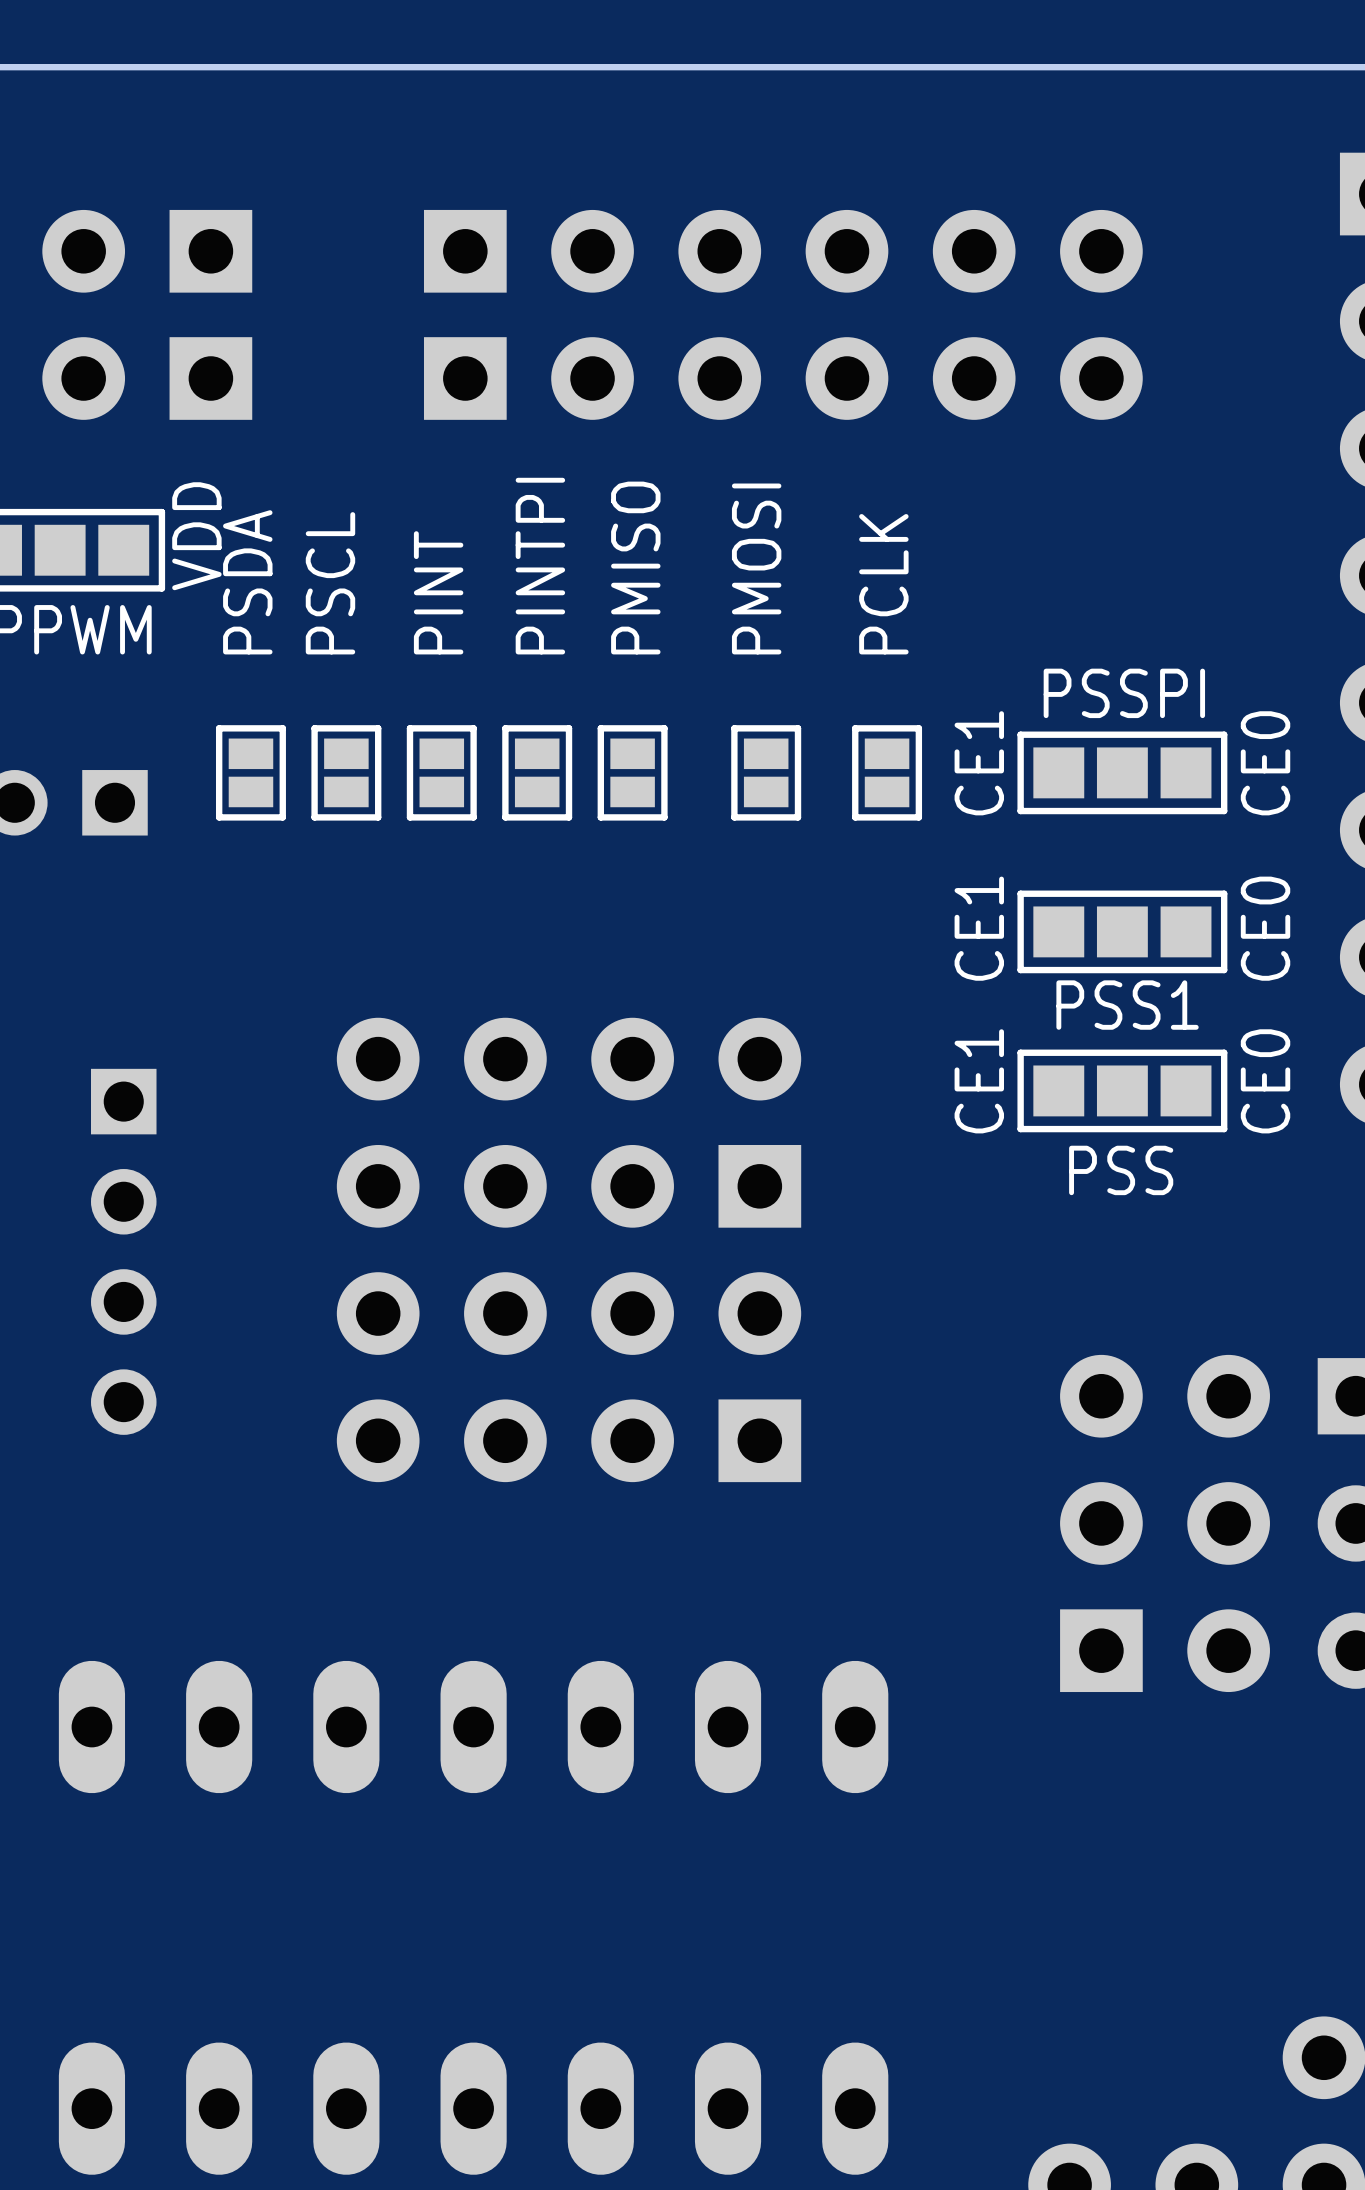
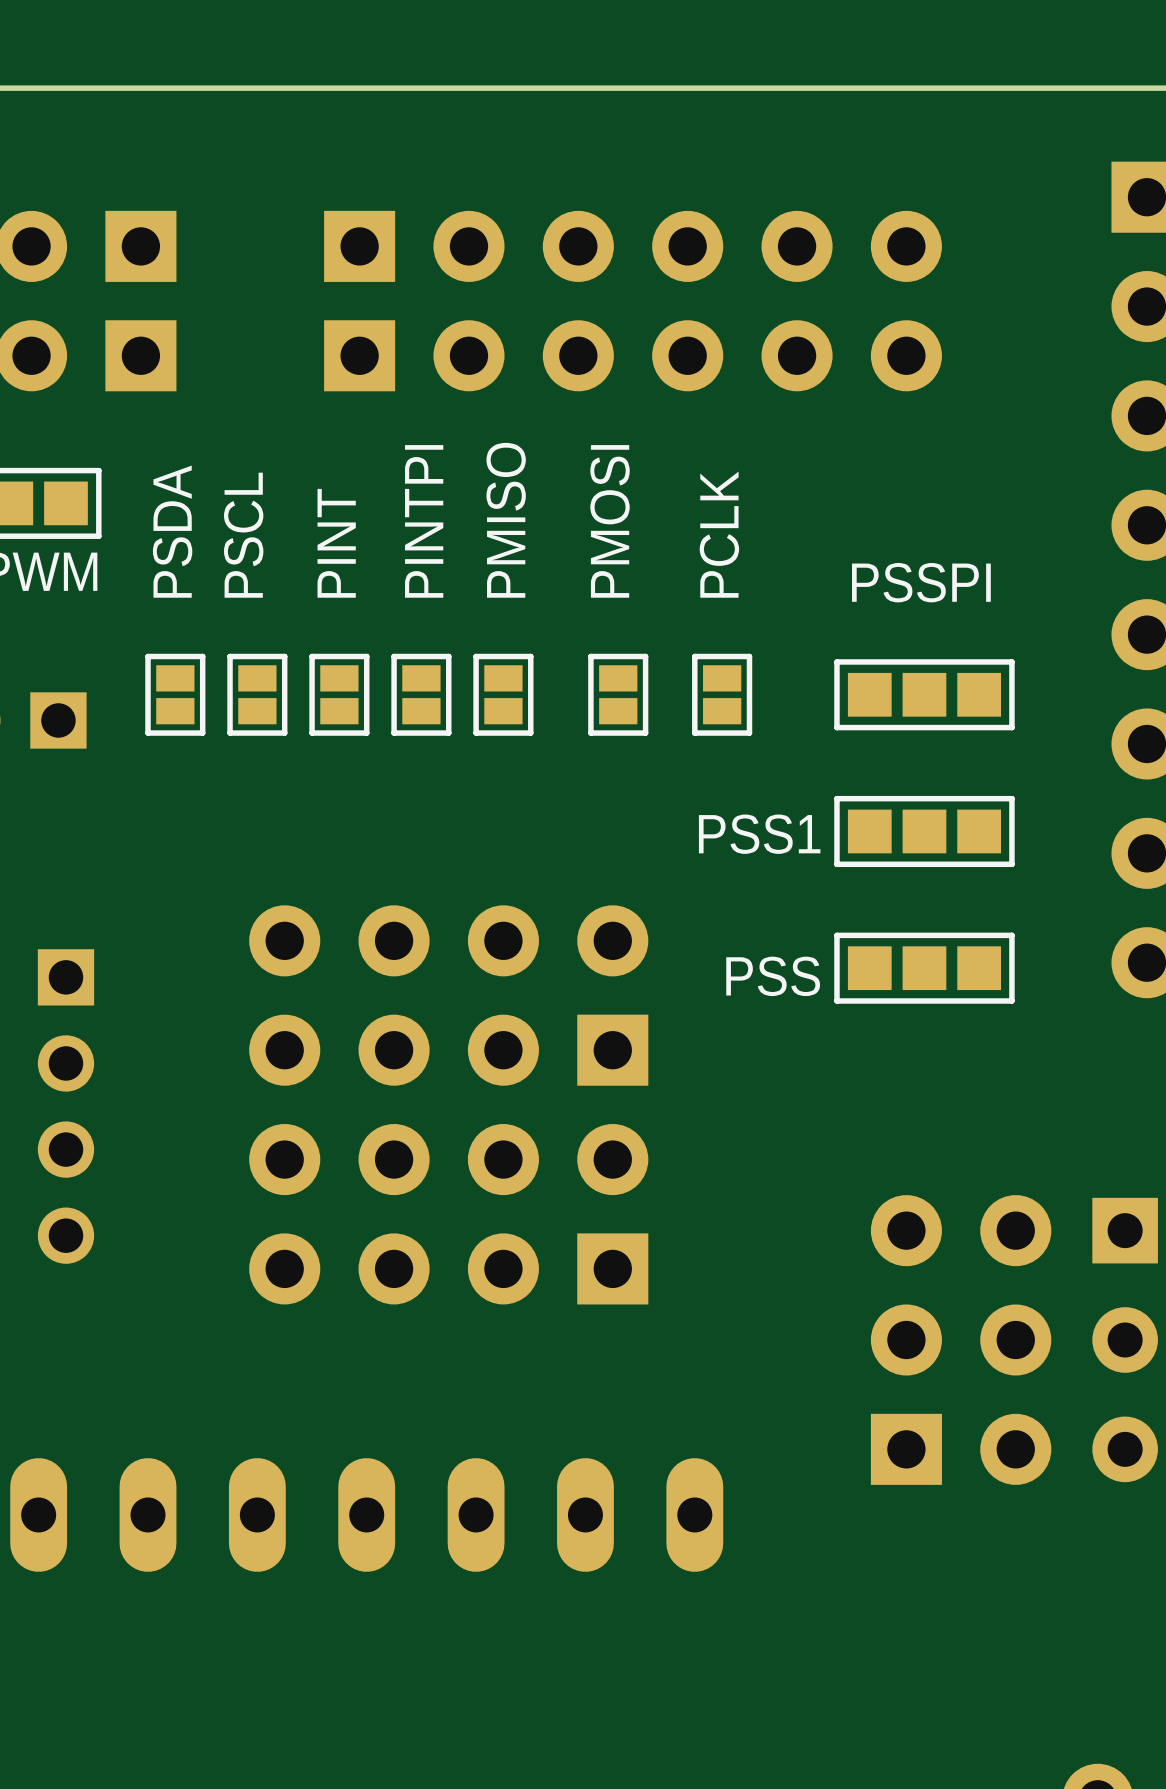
text: VDD (196, 536) -> none
PSSPI name position: PSSPI (1124, 693) -> PSSPI (921, 582)
text: CE1 (979, 763) -> none
text: CE0 (1265, 763) -> none
text: CE1 (979, 928) -> none
text: CE0 (1265, 928) -> none
PSS1 name position: PSS1 (1127, 1005) -> PSS1 (759, 834)
text: CE1 (979, 1081) -> none
text: CE0 (1265, 1081) -> none
PSS name position: PSS (1121, 1170) -> PSS (773, 976)

